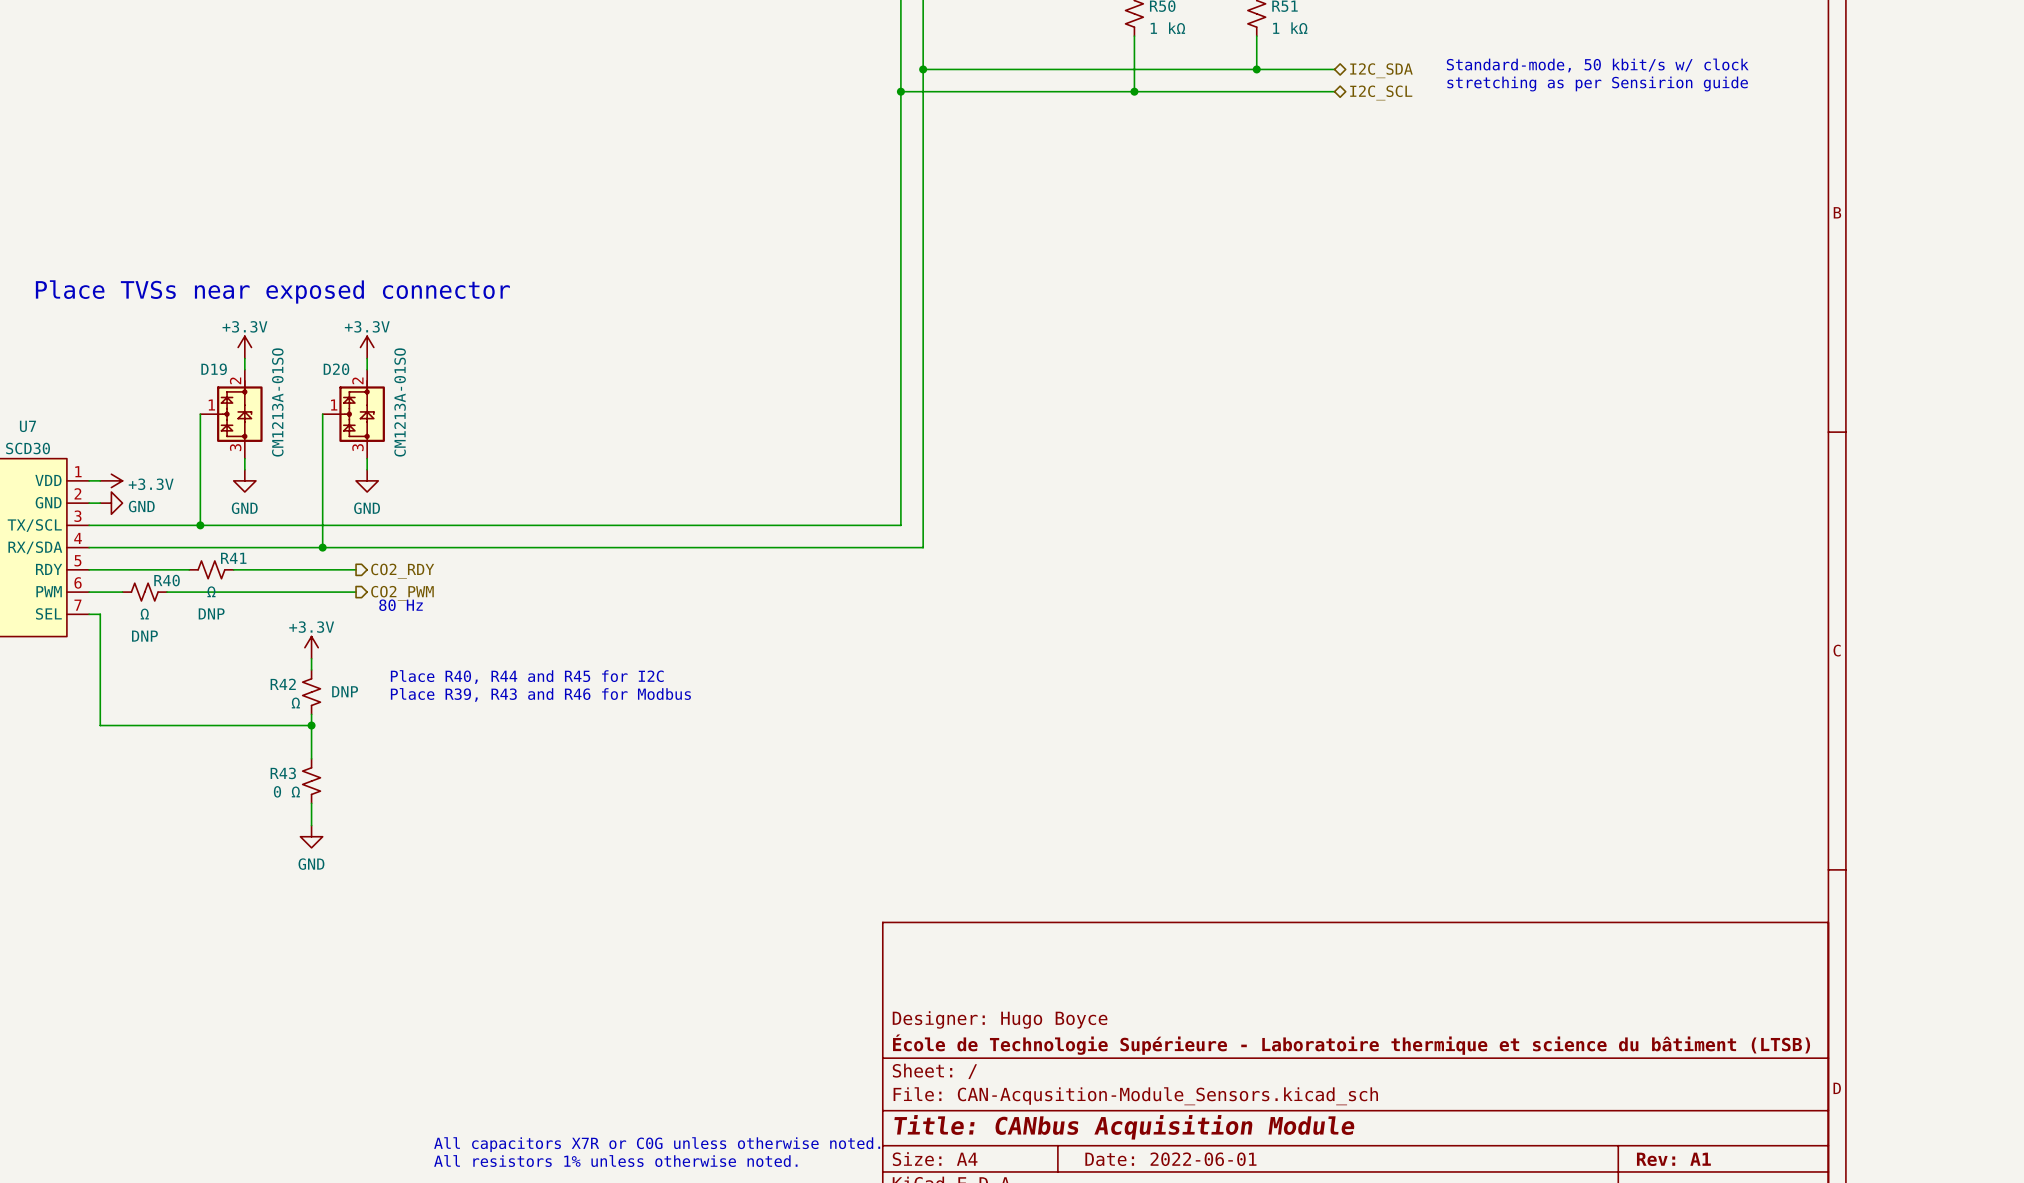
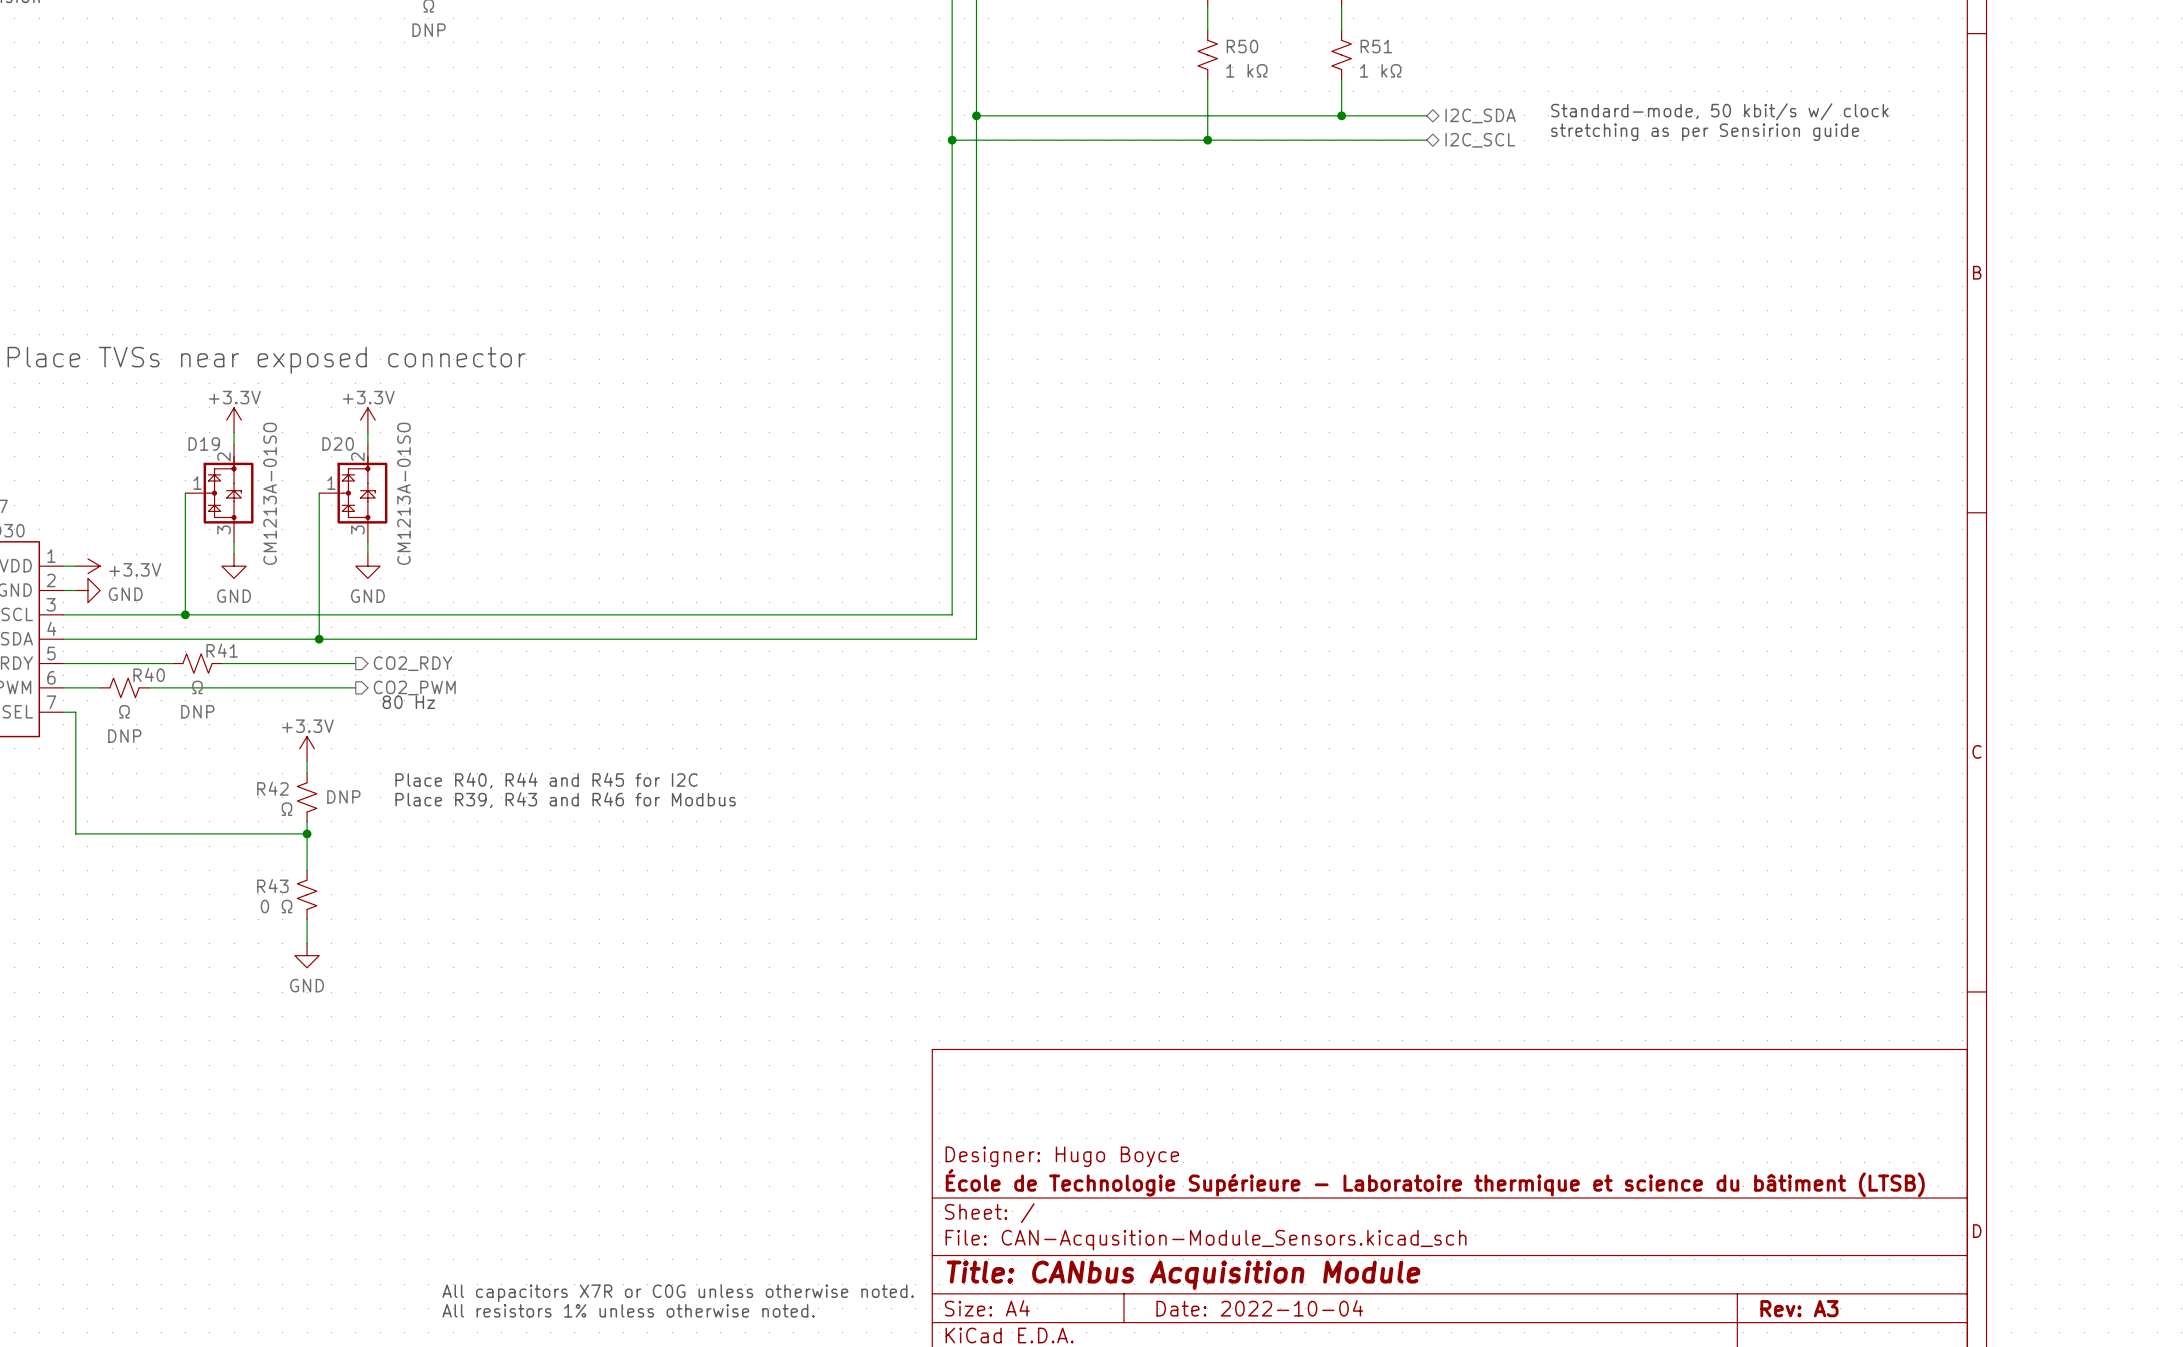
title block: Date: 2022-06-01 (1170, 1159) -> Date: 2022-10-04 (1259, 1308)
title block: Rev: A1 (1673, 1159) -> Rev: A3 (1799, 1308)

